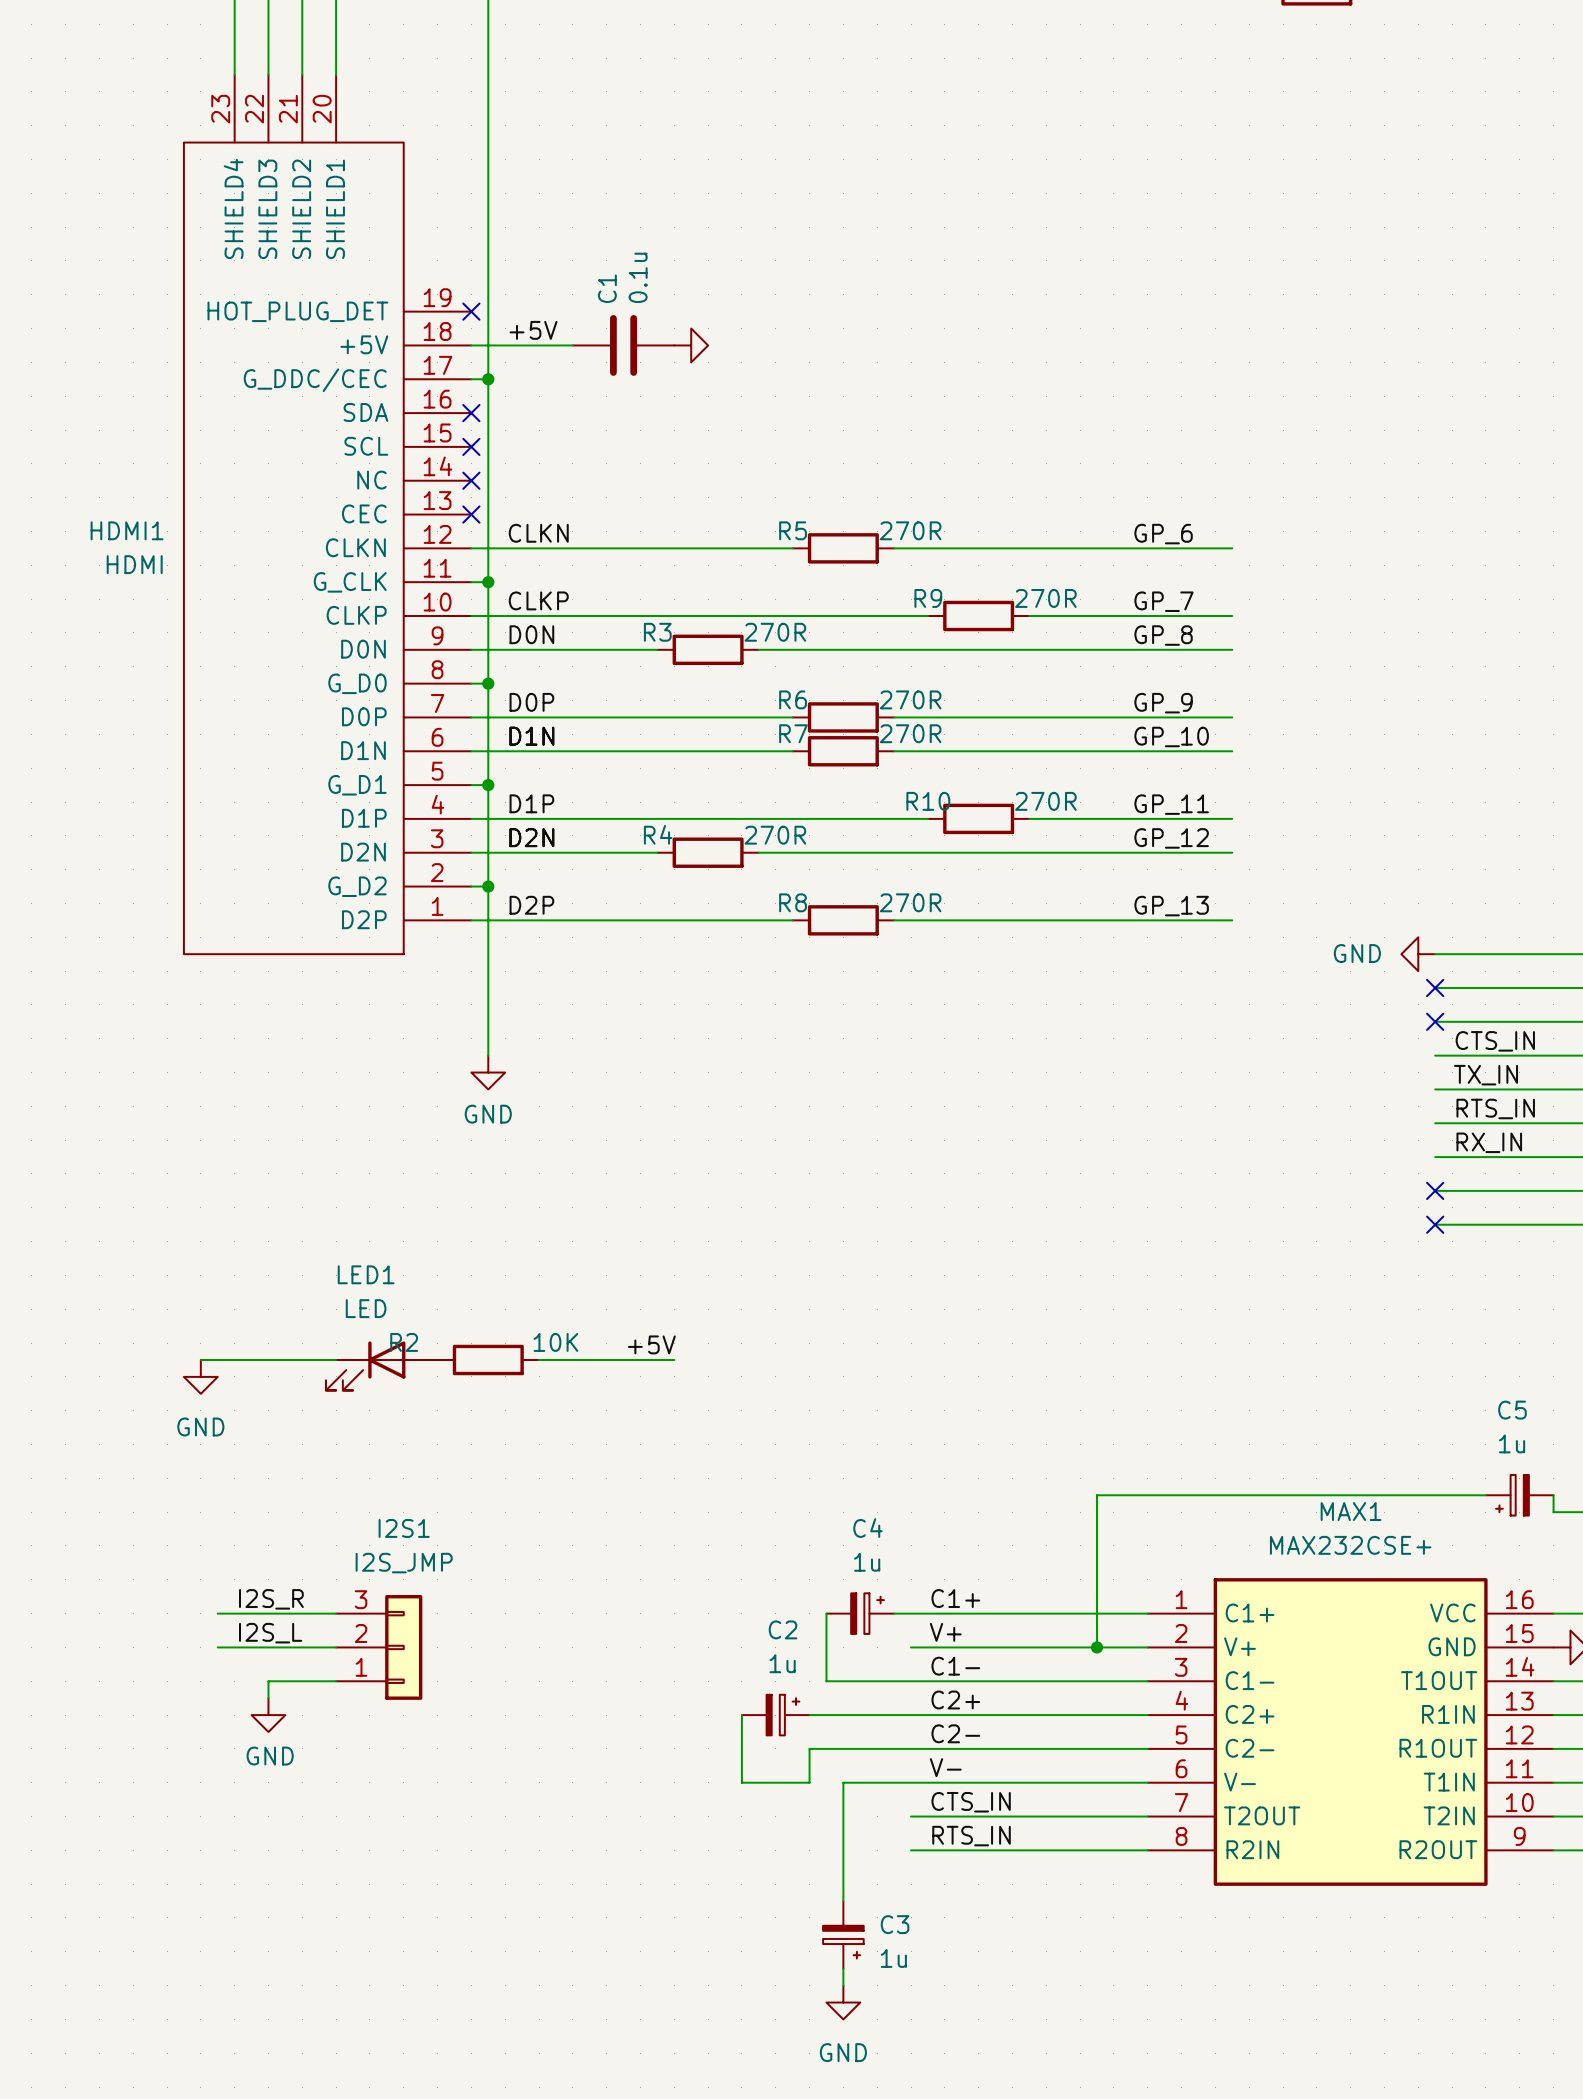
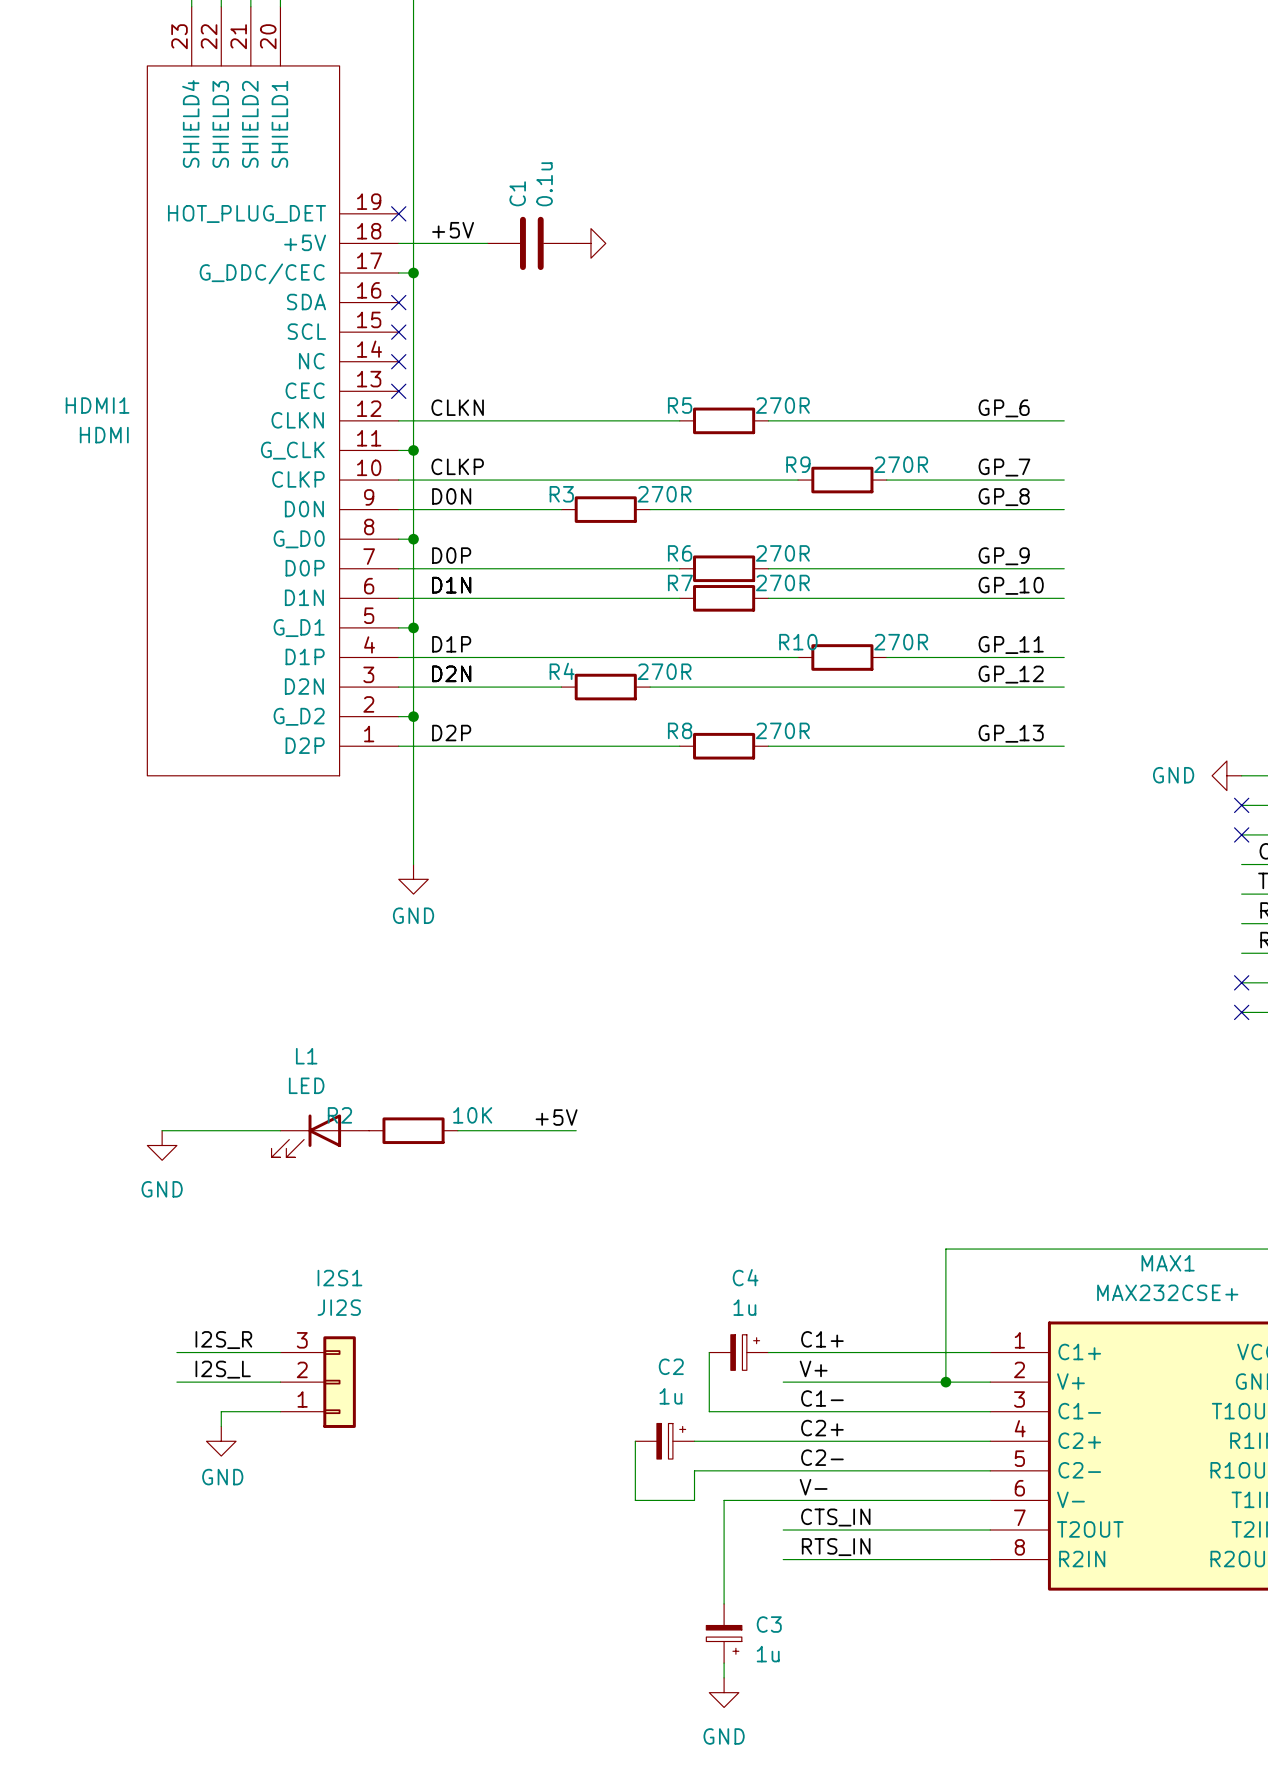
LED1 name: LED1 (366, 1274) -> L1 (306, 1056)
I2S1 value: I2S_JMP (404, 1563) -> JI2S (339, 1307)

